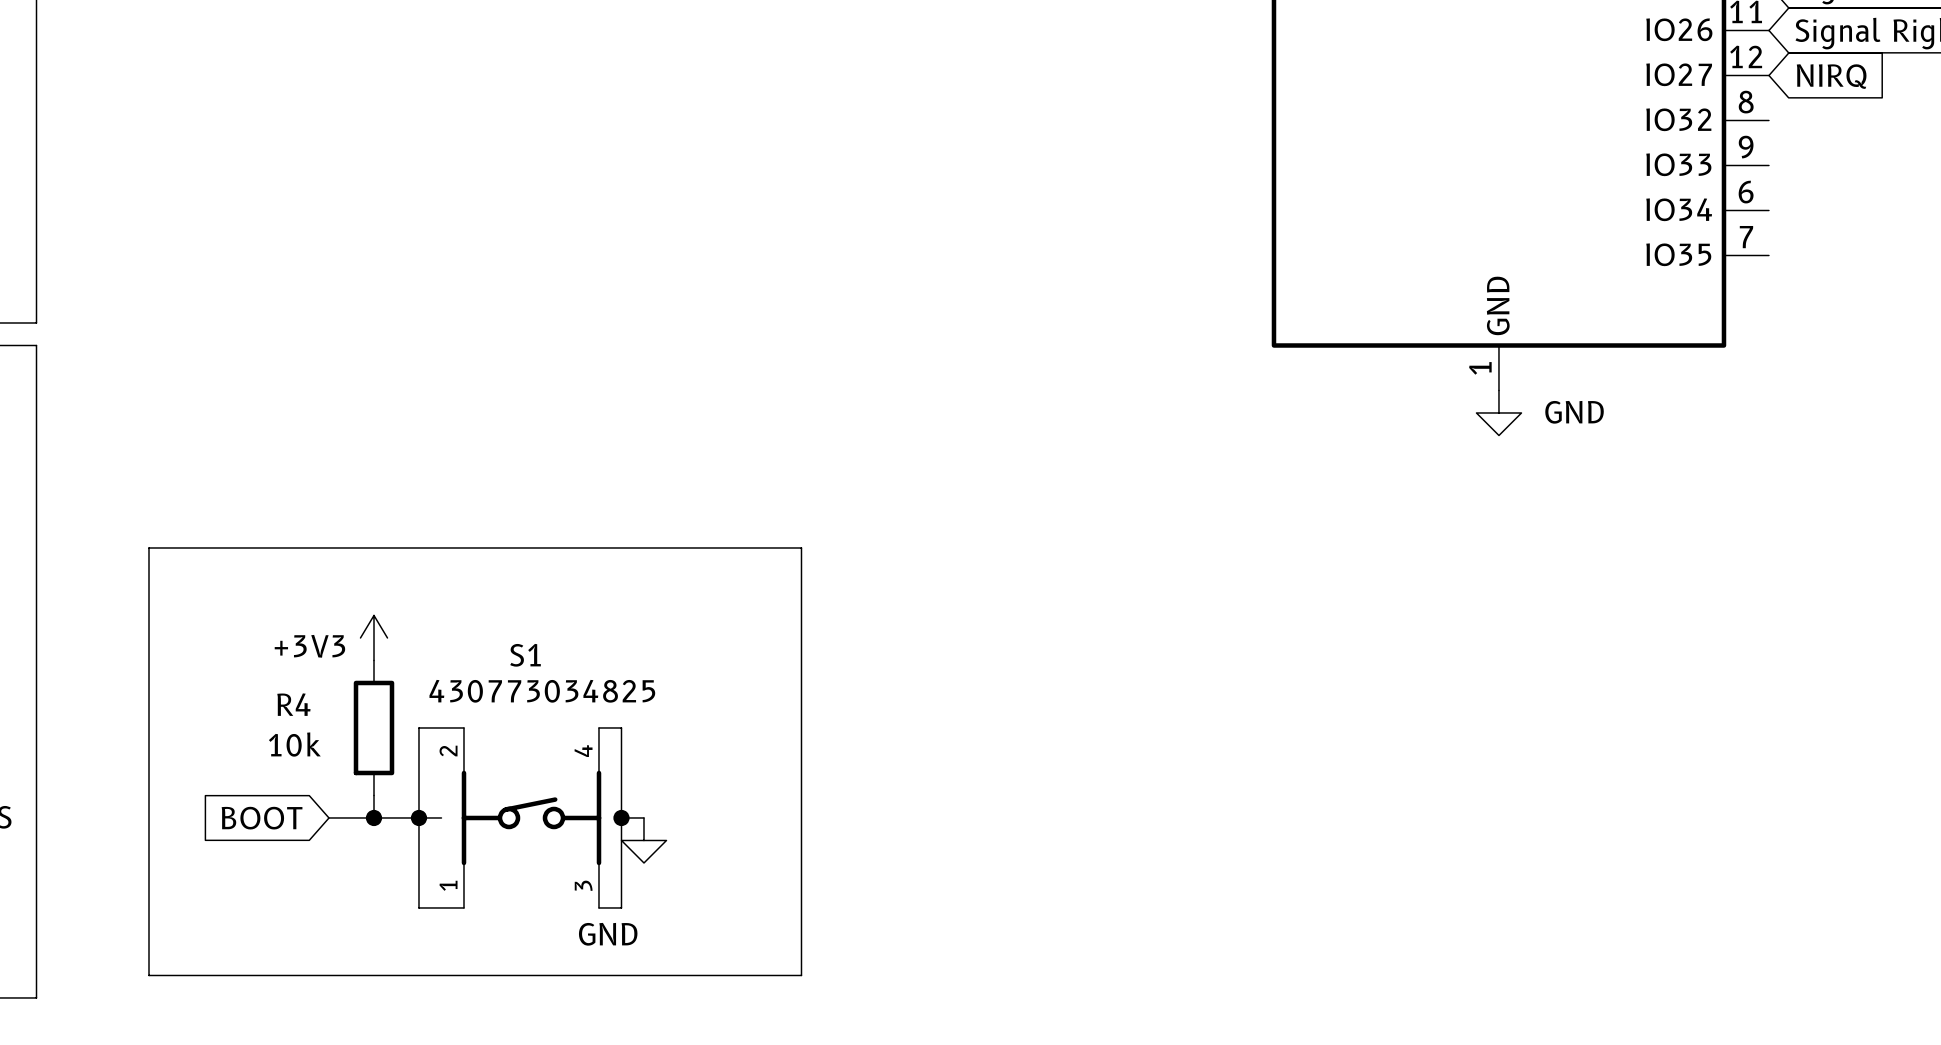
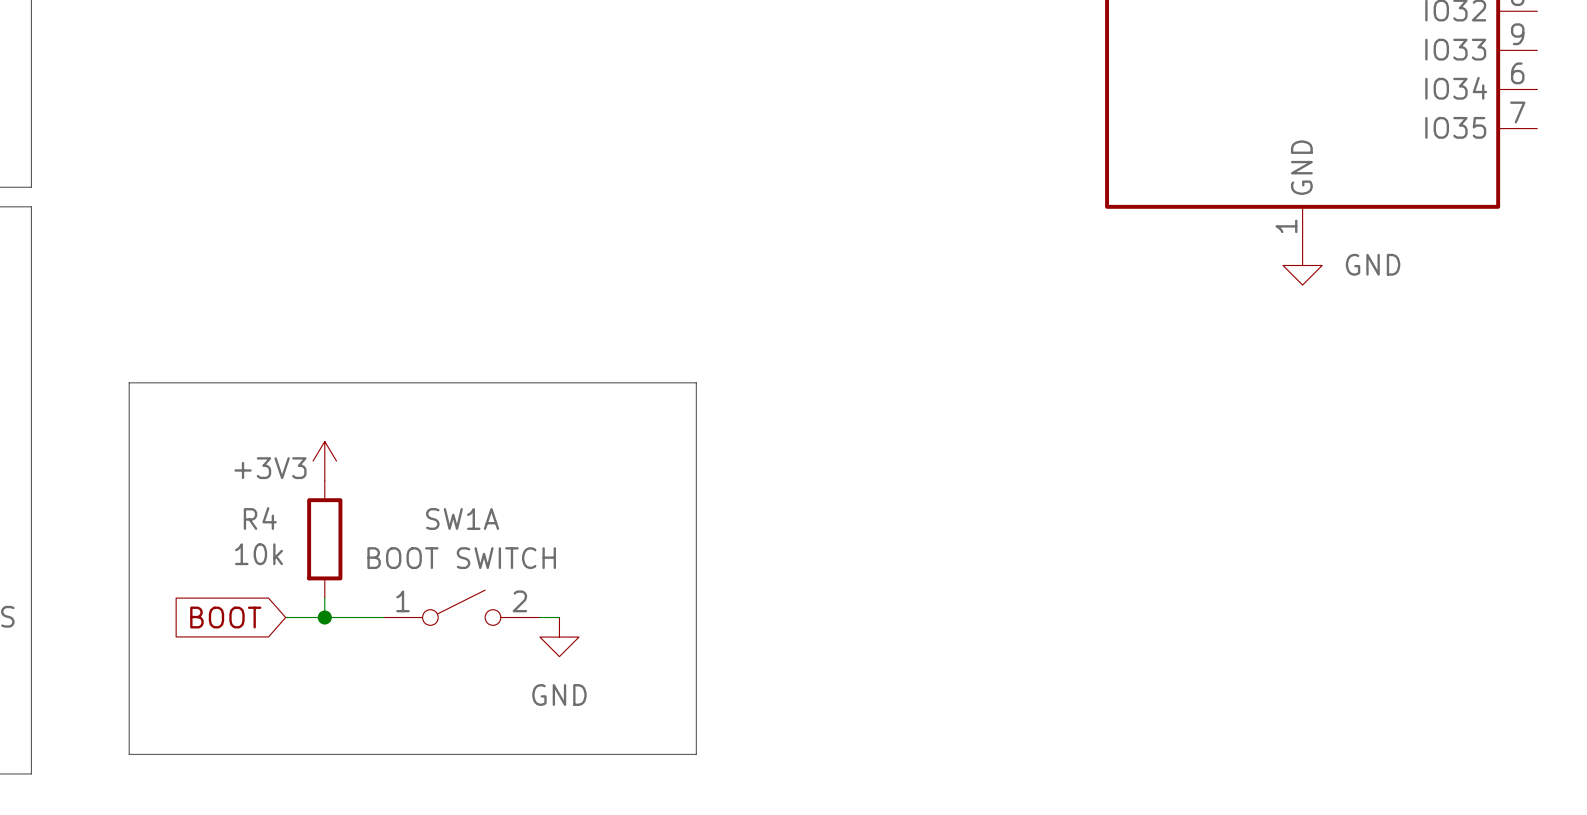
wire: (463, 727) (418, 727) (418, 907) (463, 907) -> none
wire: (598, 727) (621, 727) (621, 907) (598, 907) -> none
SW1A: none -> BOOT SWITCH (461, 607)
junction: (418, 817) -> none
S1: 430773034825 (531, 817) -> none
junction: (621, 817) -> none
power symbol text position: GND (608, 934) -> GND (559, 695)

